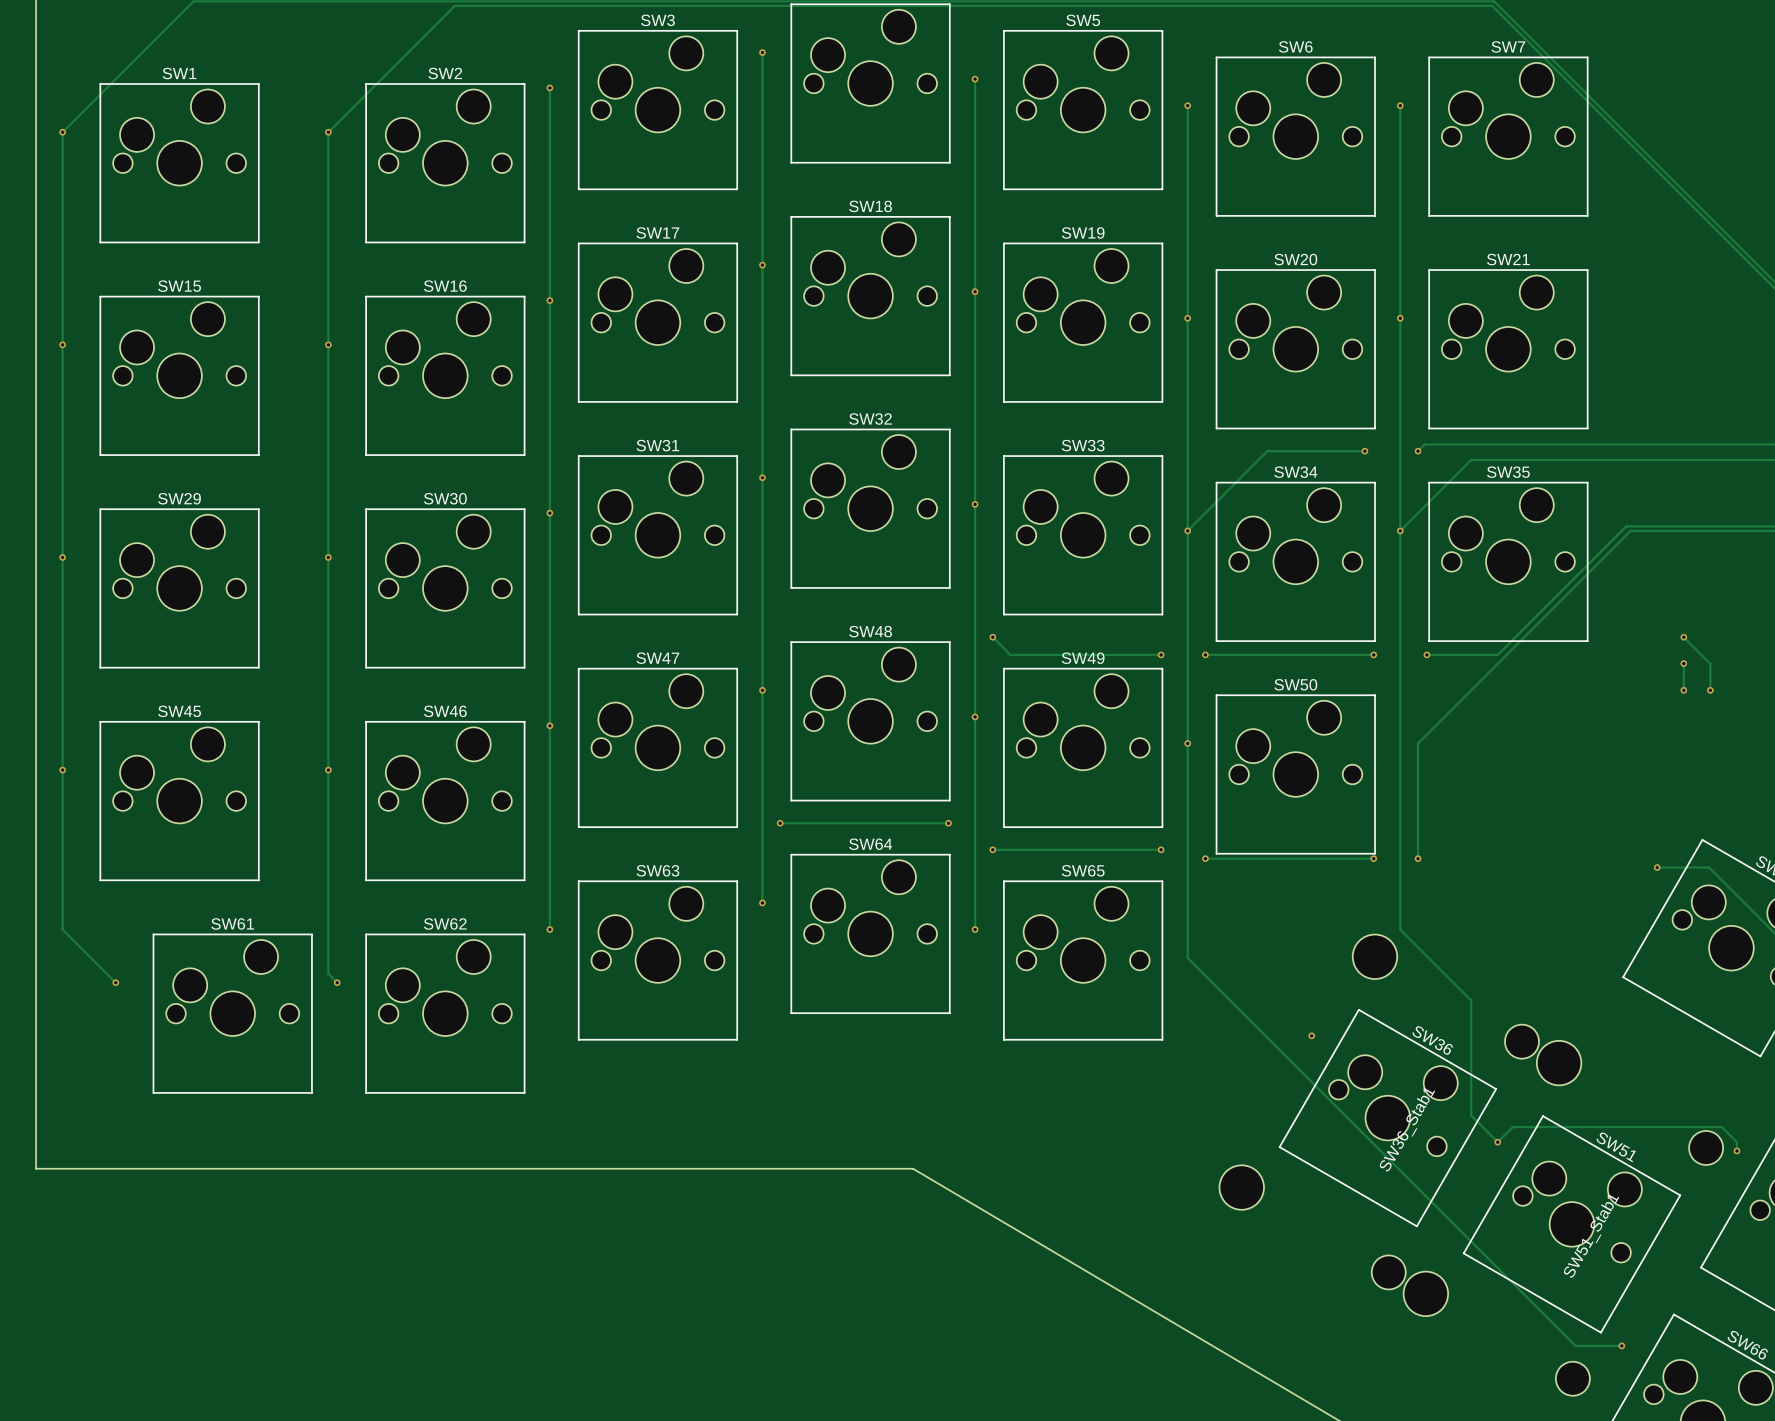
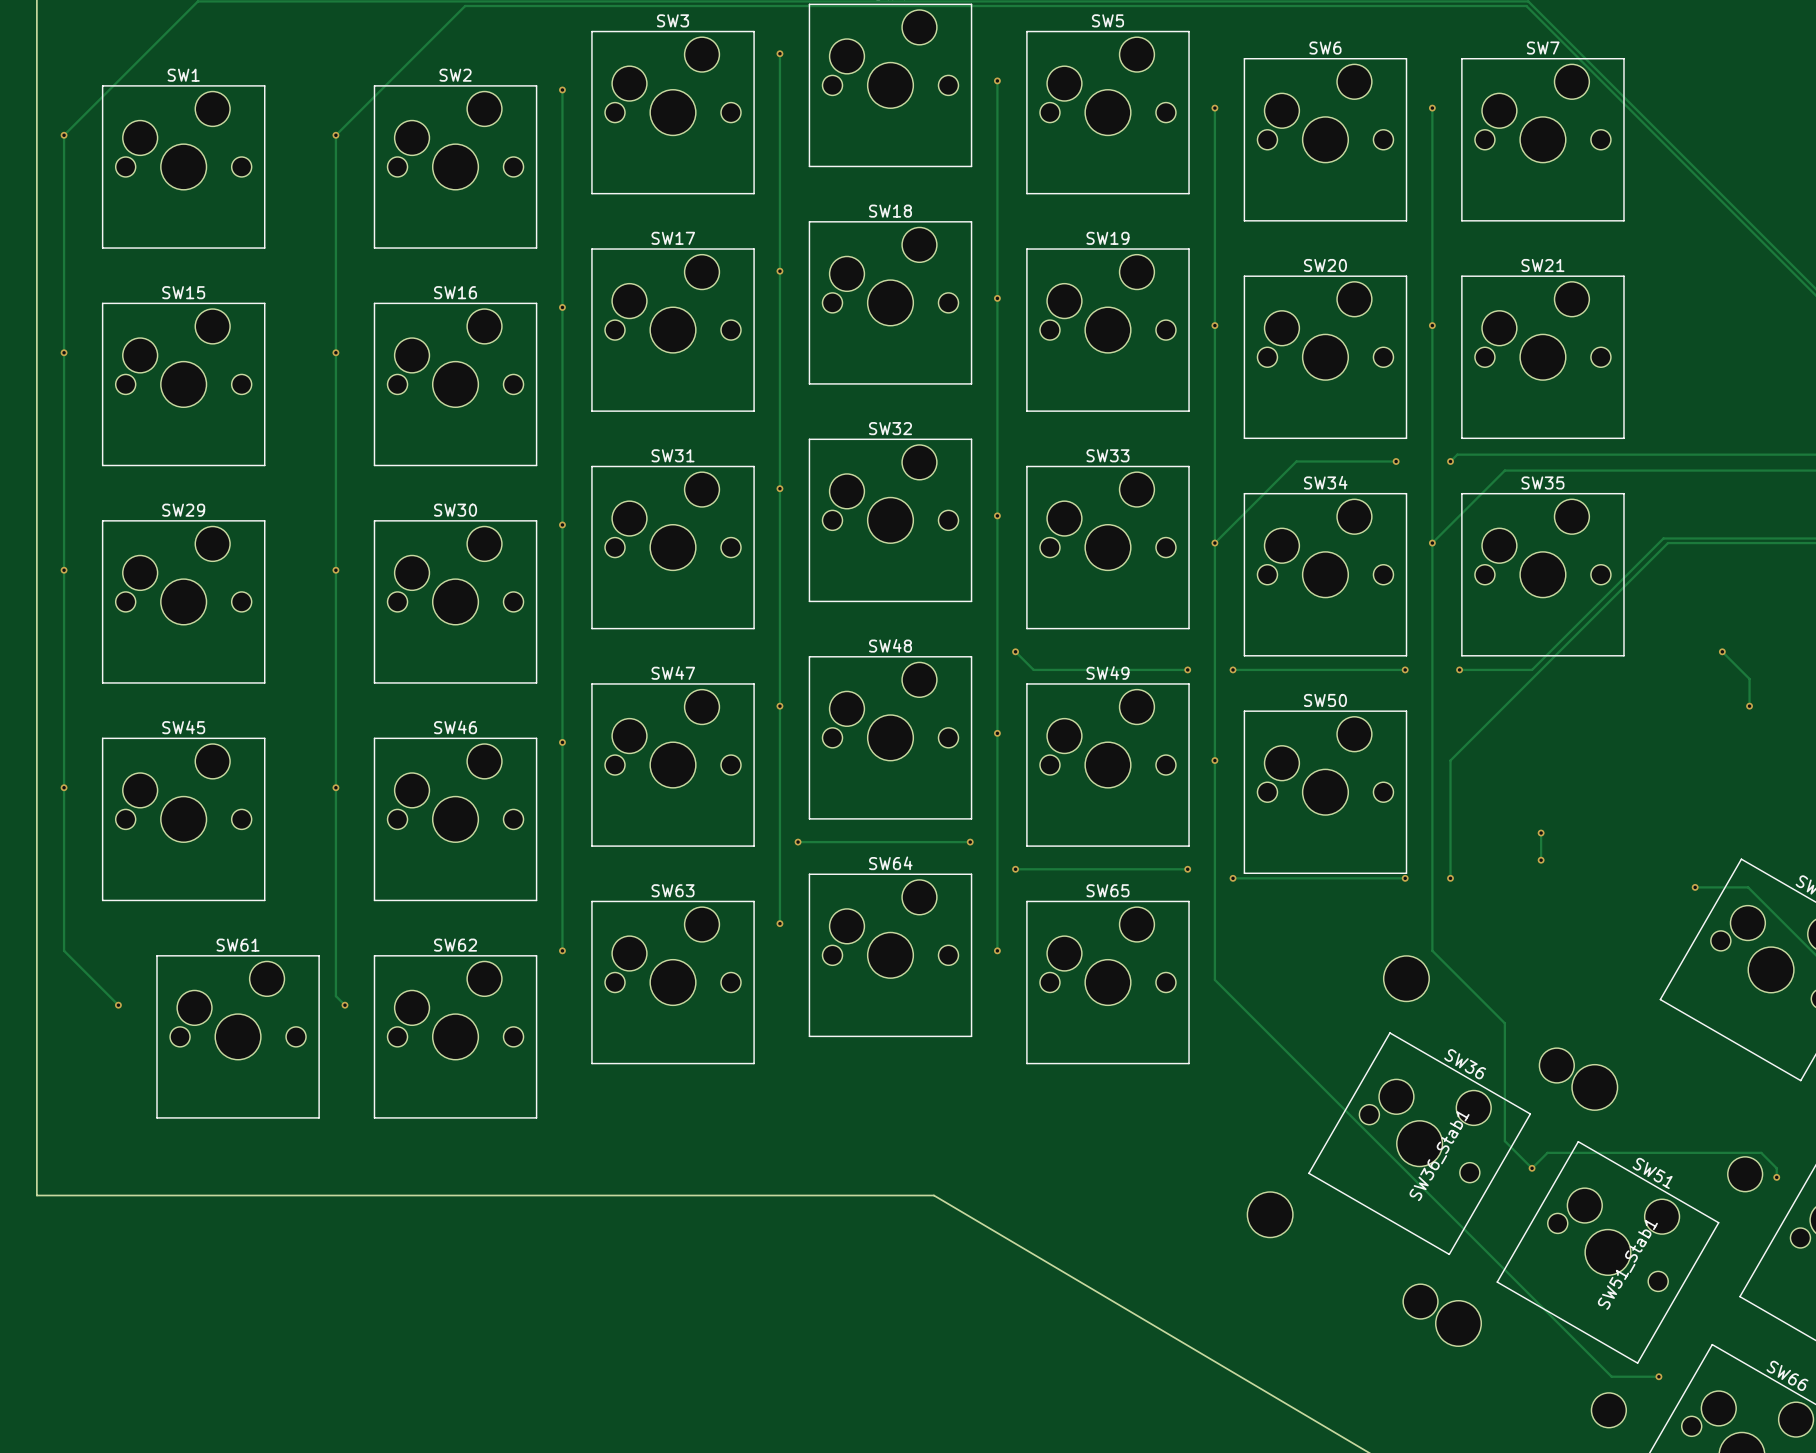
track: (1683, 663) (1683, 690) -> (1541, 833) (1541, 860)
via: (1683, 663) -> none
via: (1683, 690) -> none
via: none -> (1541, 833)
via: none -> (1541, 860)
via: (1311, 1035) -> none

